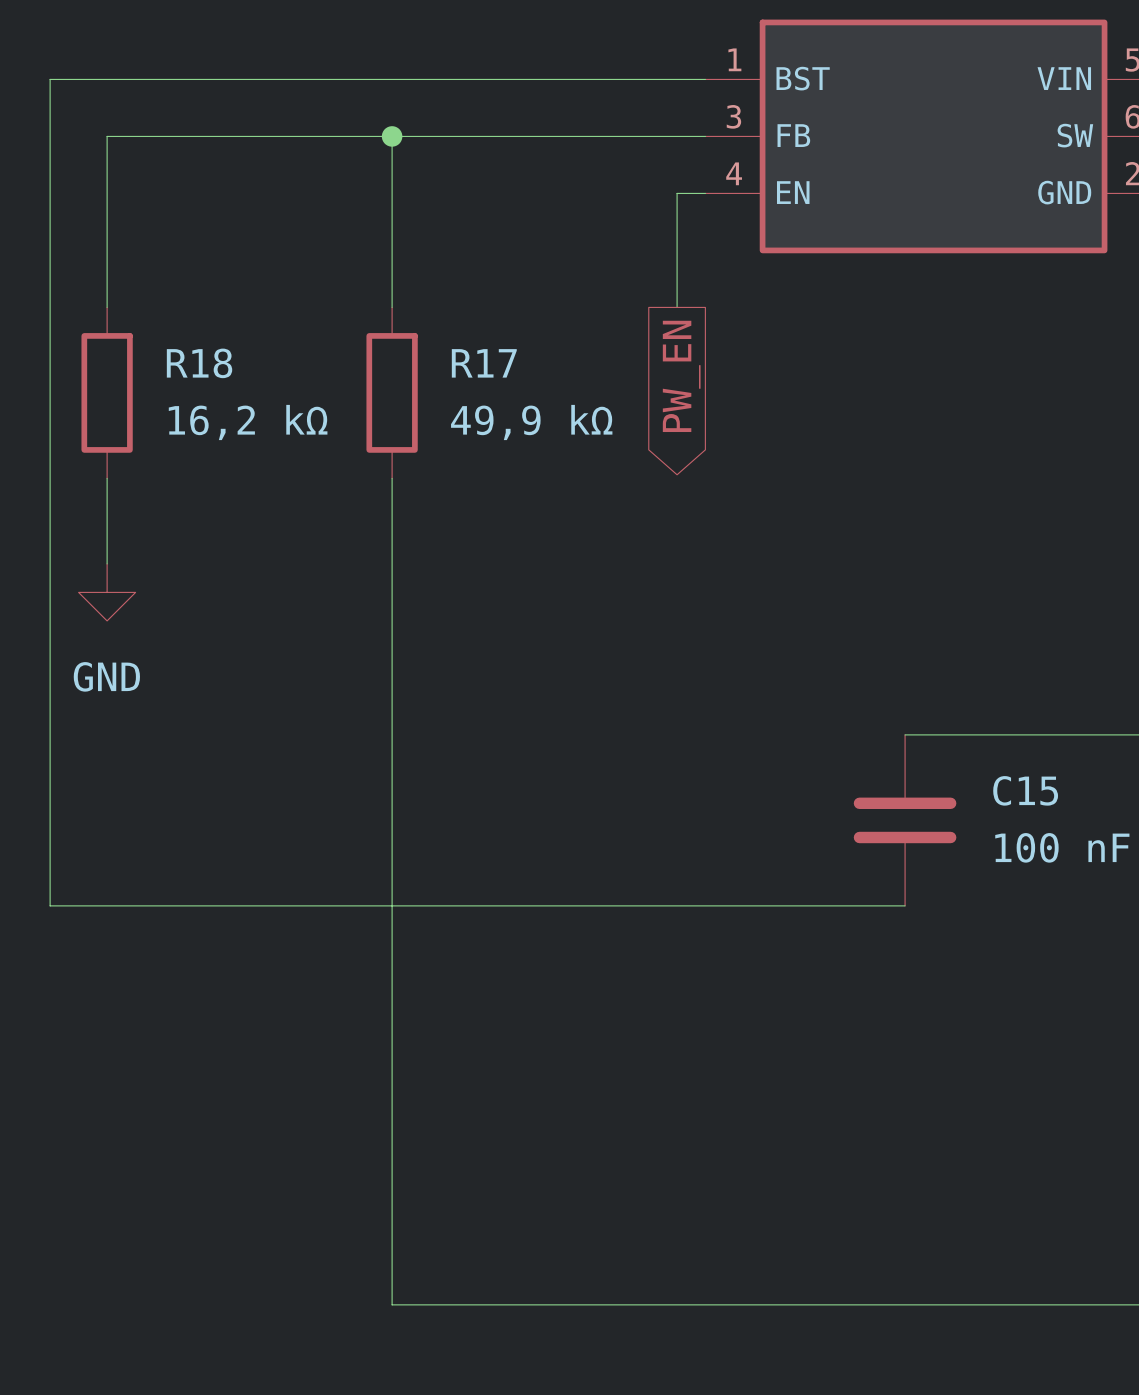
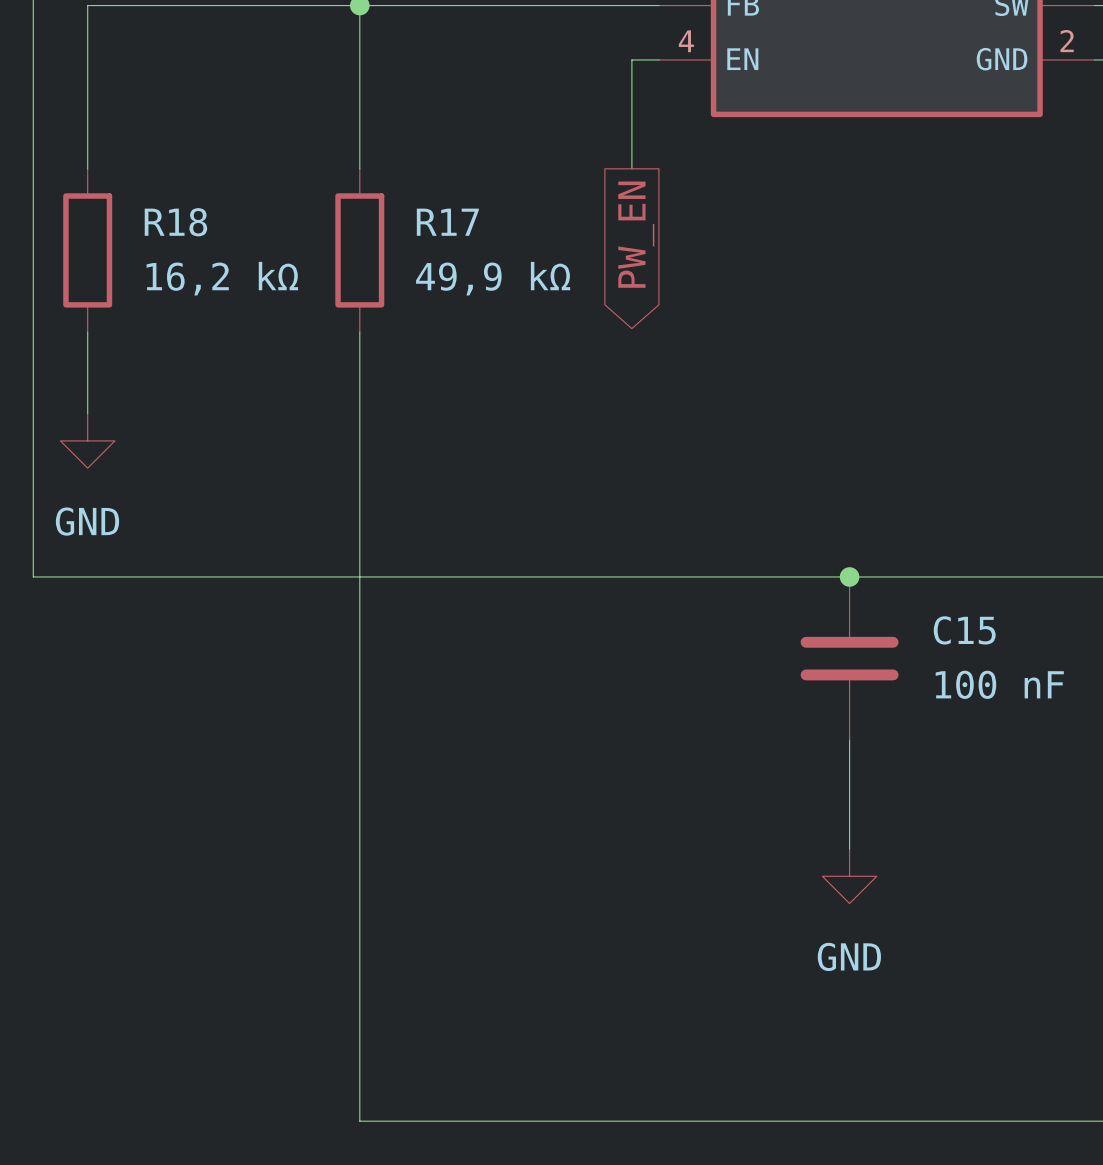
wire: (50, 734) (50, 905) (905, 905) -> (33, 576) (849, 576)
junction: none -> (849, 576)
wire: none -> (849, 740) (849, 849)
power symbol: none -> GND (849, 876)

